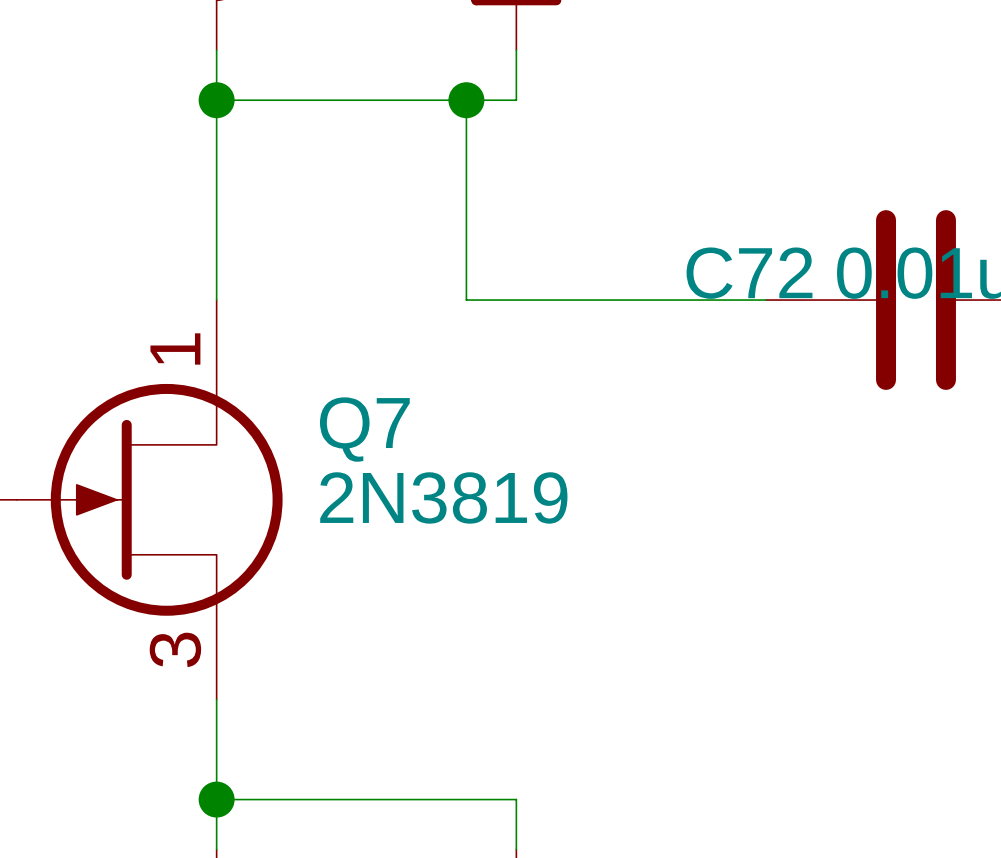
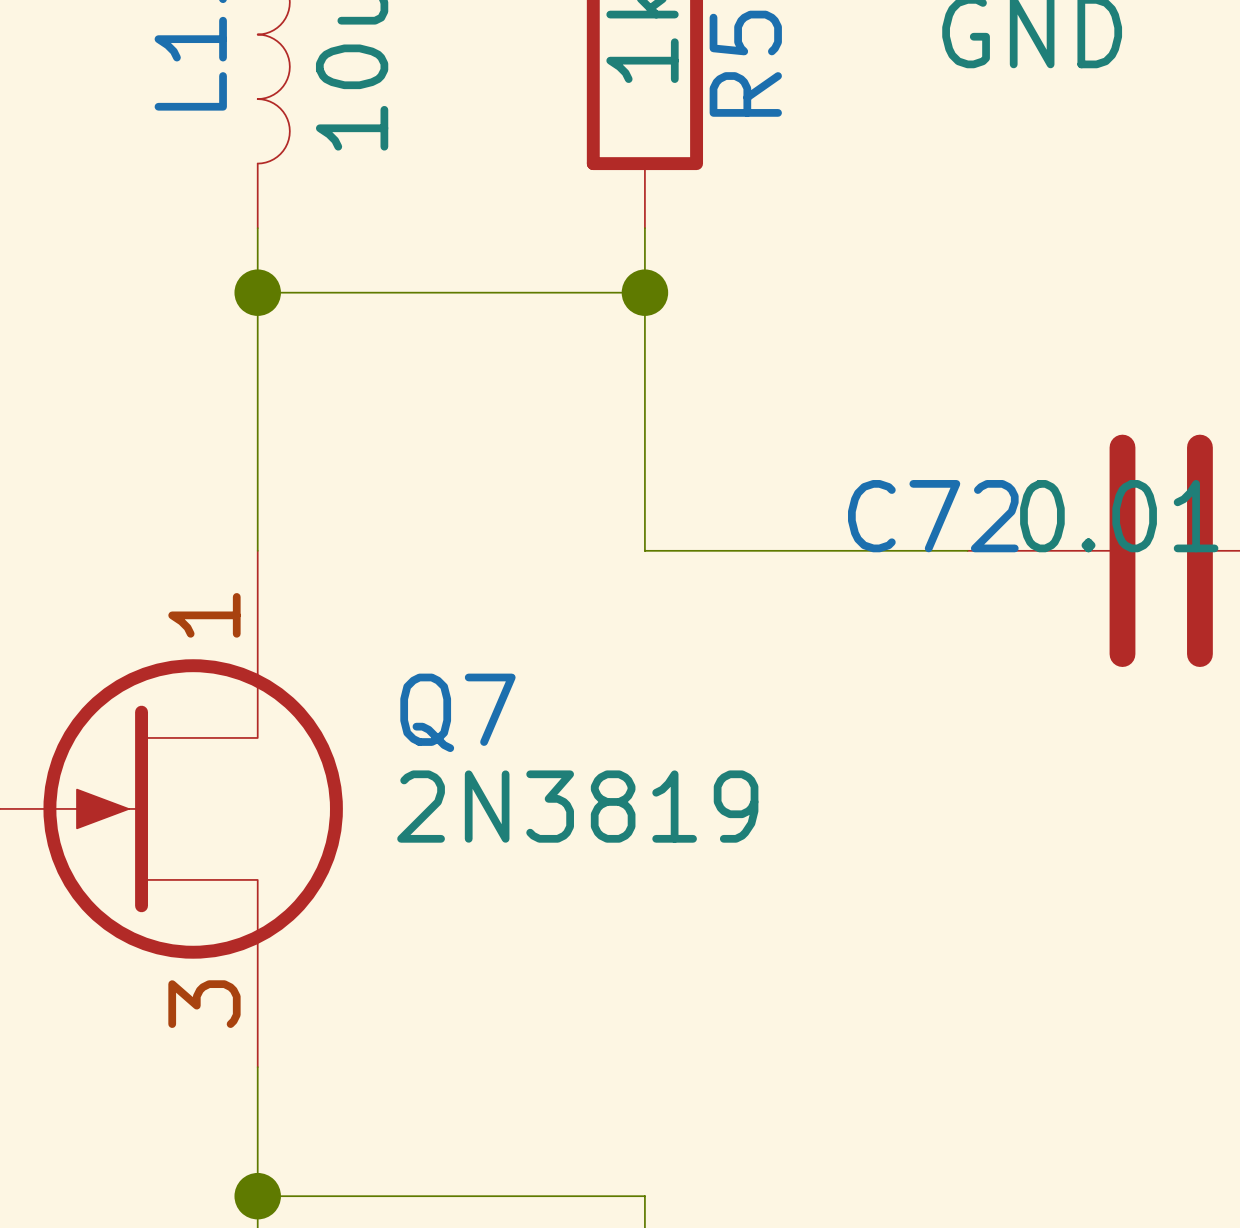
wire: (466, 100) (466, 300) (516, 300) -> (644, 292) (644, 550)
junction position: (466, 100) -> (644, 292)

